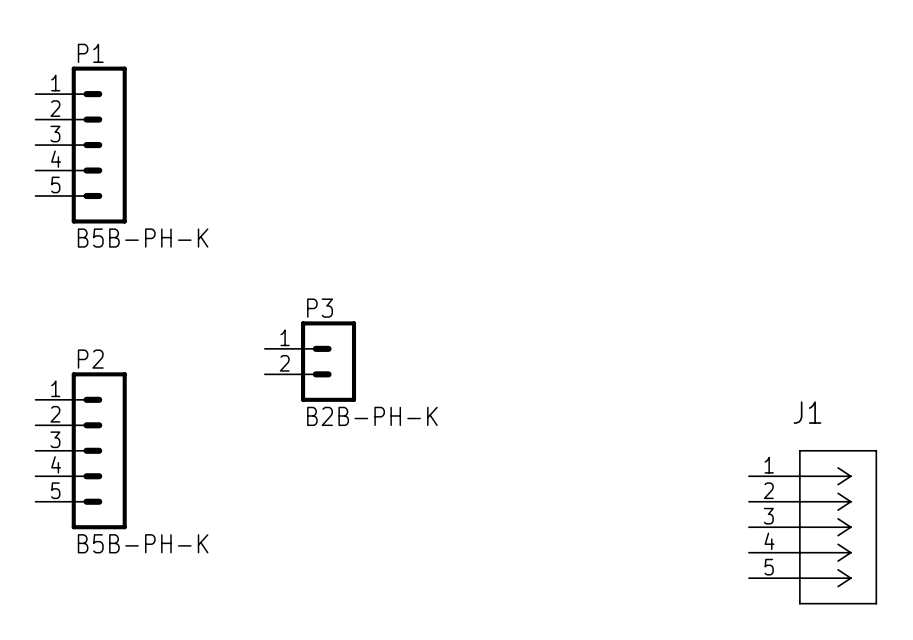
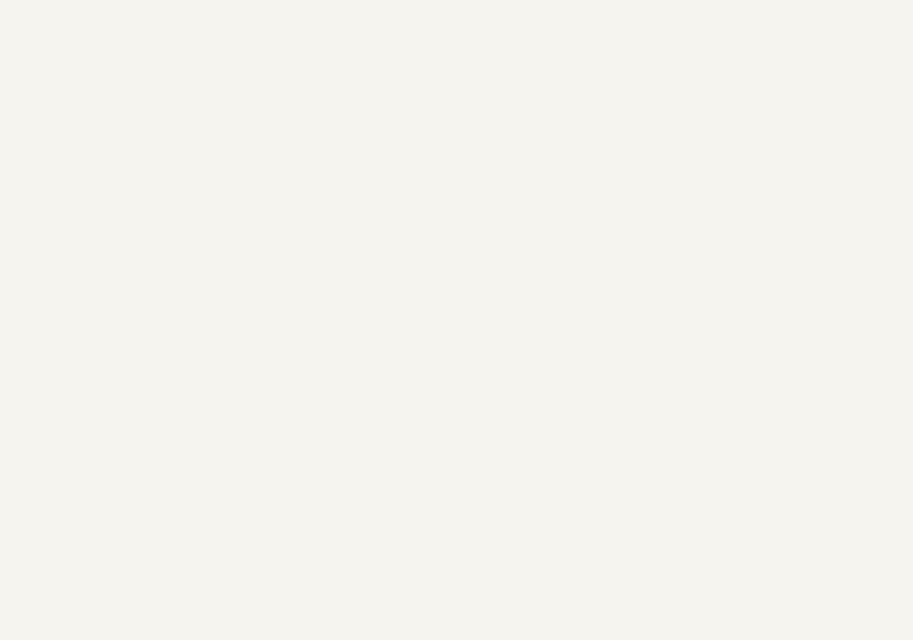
P1: B5B-PH-K (81, 145) -> none
P3: B2B-PH-K (310, 361) -> none
P2: B5B-PH-K (81, 450) -> none
J1: (813, 527) -> none

